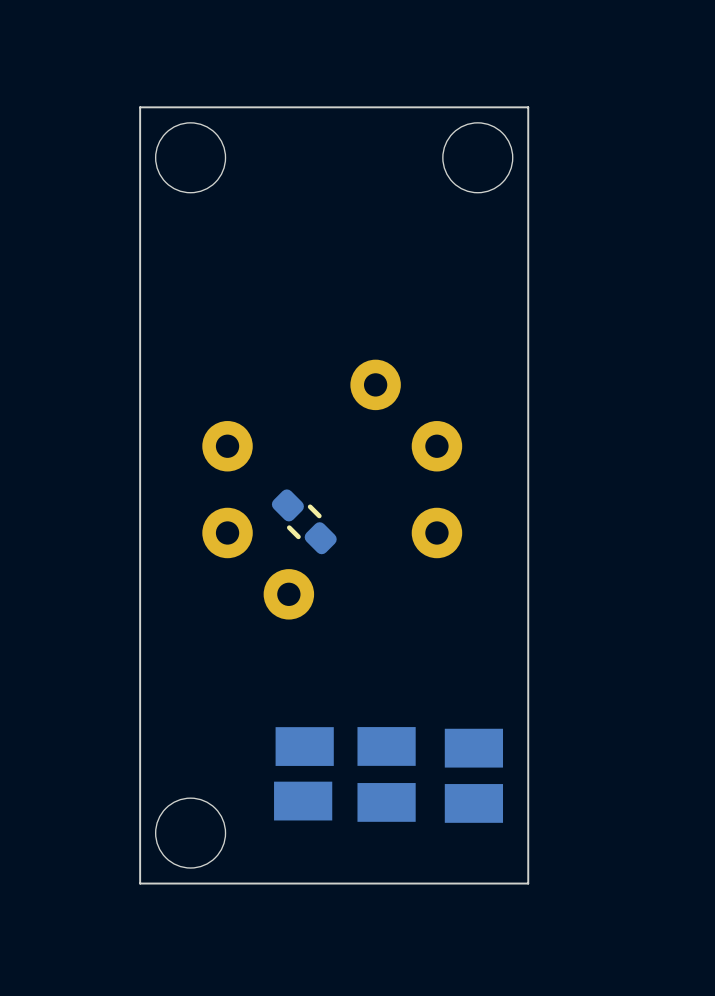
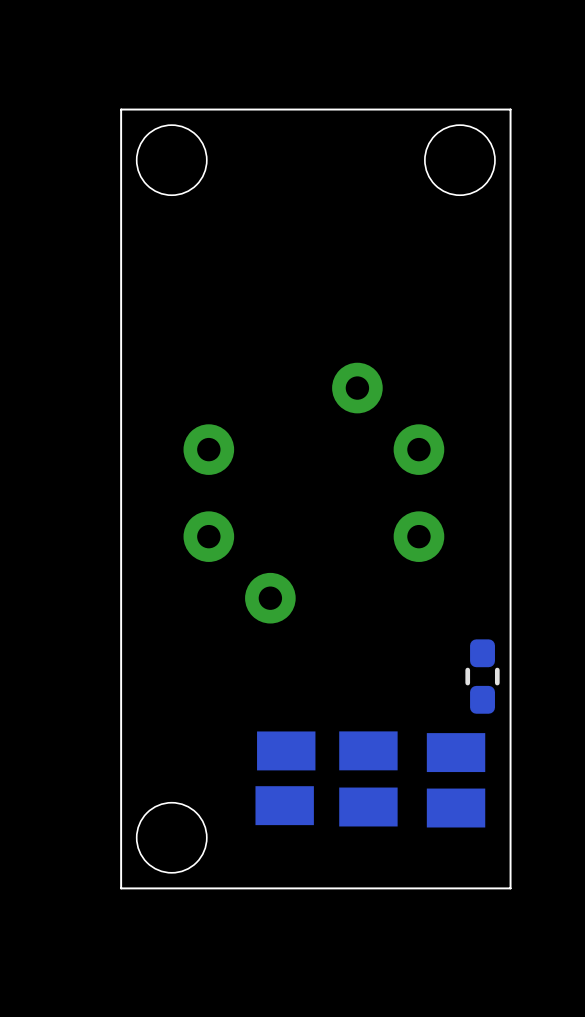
part: (304, 521) -> none
part: none -> (482, 676)

